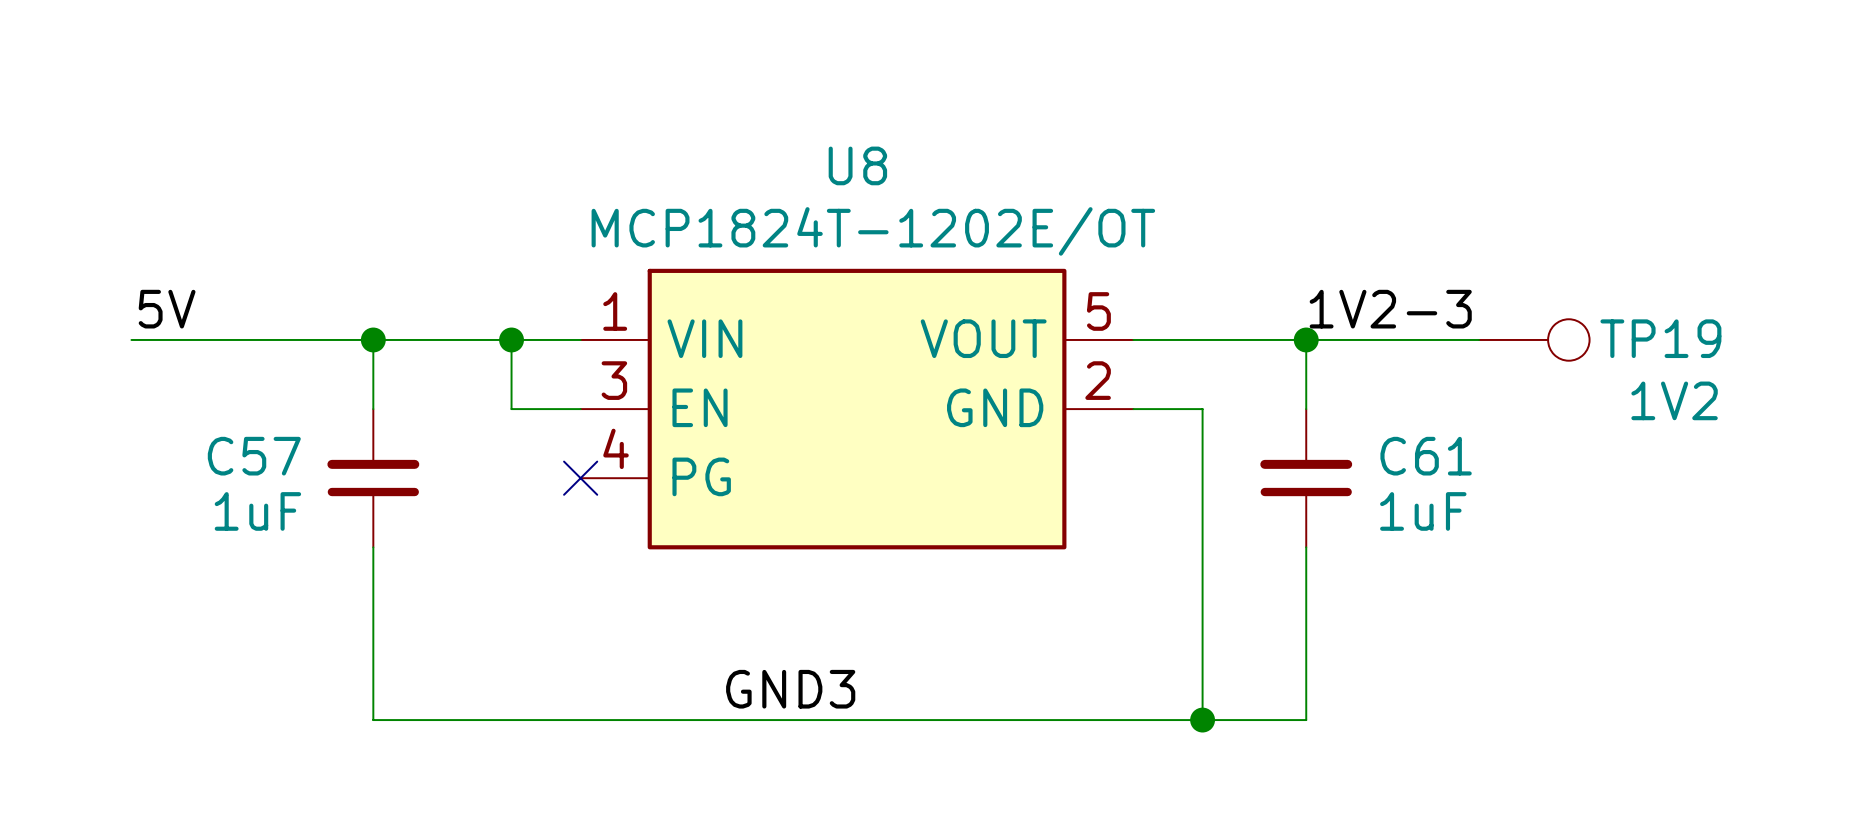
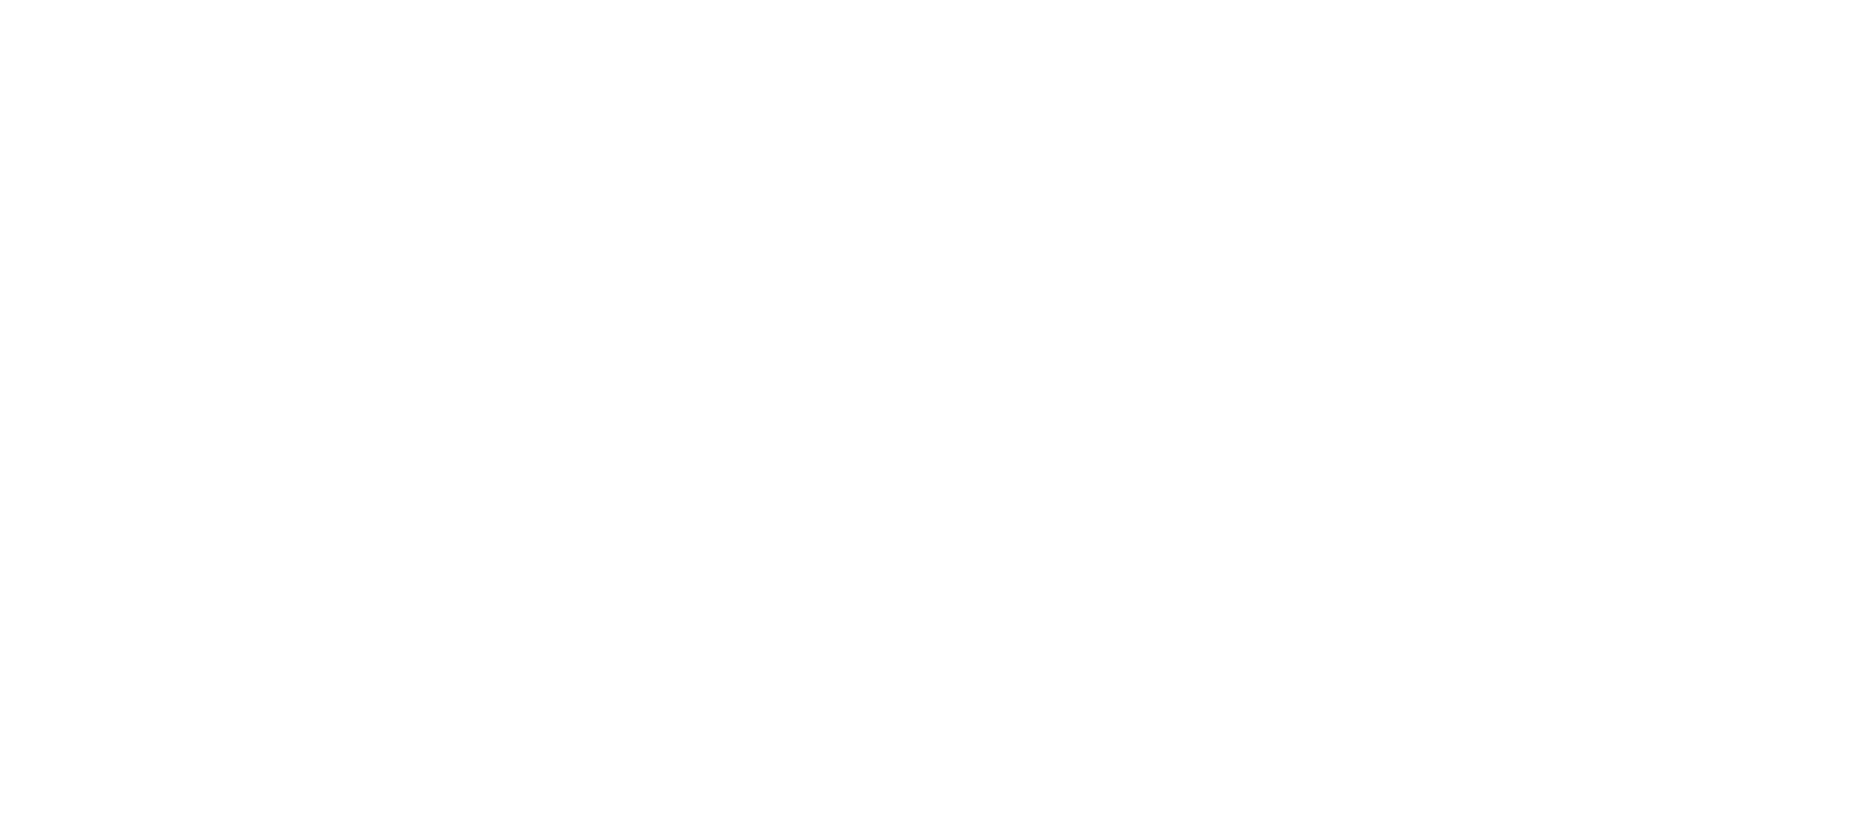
label: 5V (167, 309) -> none
label: 1V2-3 (1390, 309) -> none
wire: (131, 339) (580, 339) -> none
wire: (373, 339) (373, 409) -> none
junction: (373, 339) -> none
wire: (511, 339) (511, 409) (580, 409) -> none
junction: (511, 339) -> none
wire: (1133, 339) (1479, 339) -> none
wire: (1306, 339) (1306, 409) -> none
junction: (1306, 339) -> none
TP19: 1V2 (1534, 339) -> none
U8: MCP1824T-1202E/OT (857, 409) -> none
wire: (1133, 409) (1202, 409) (1202, 720) -> none
C57: 1uF (373, 478) -> none
no-connect mark: (580, 478) -> none
C61: 1uF (1306, 478) -> none
wire: (373, 547) (373, 720) (1306, 720) (1306, 547) -> none
label: GND3 (790, 689) -> none
junction: (1202, 720) -> none

